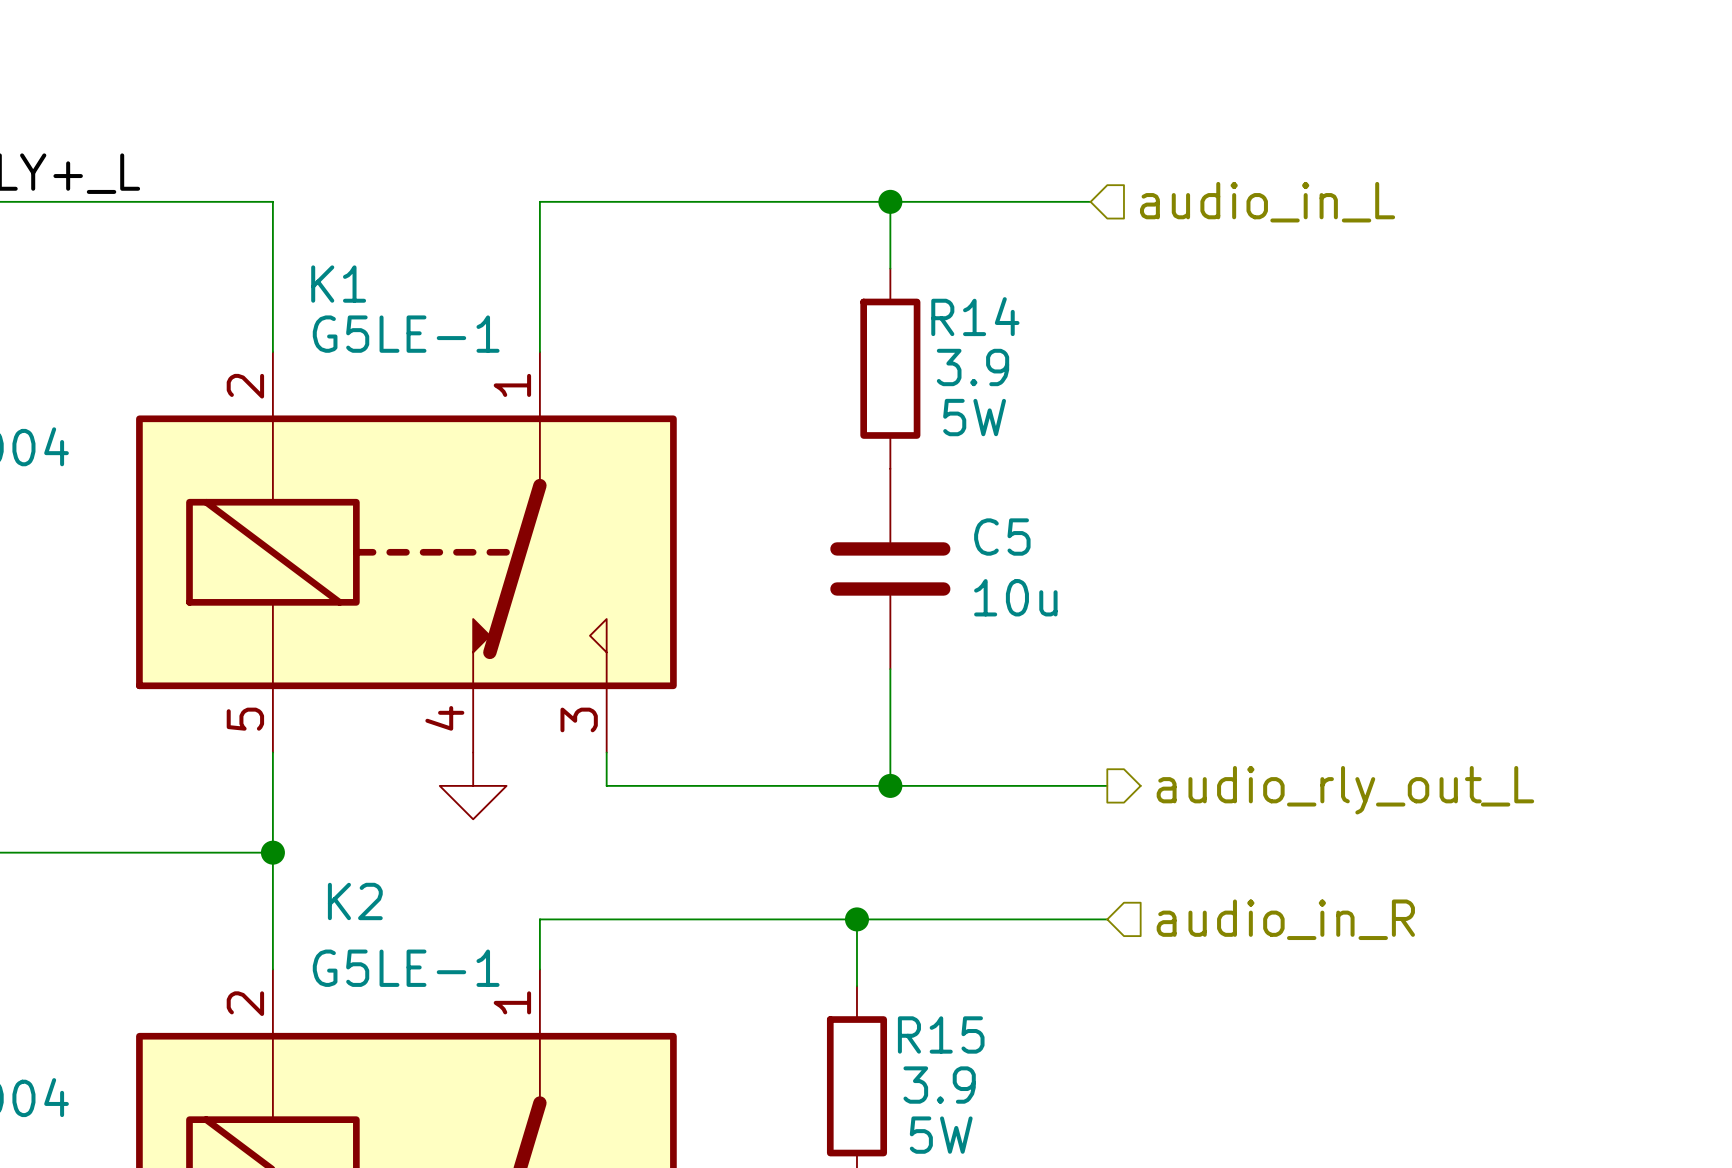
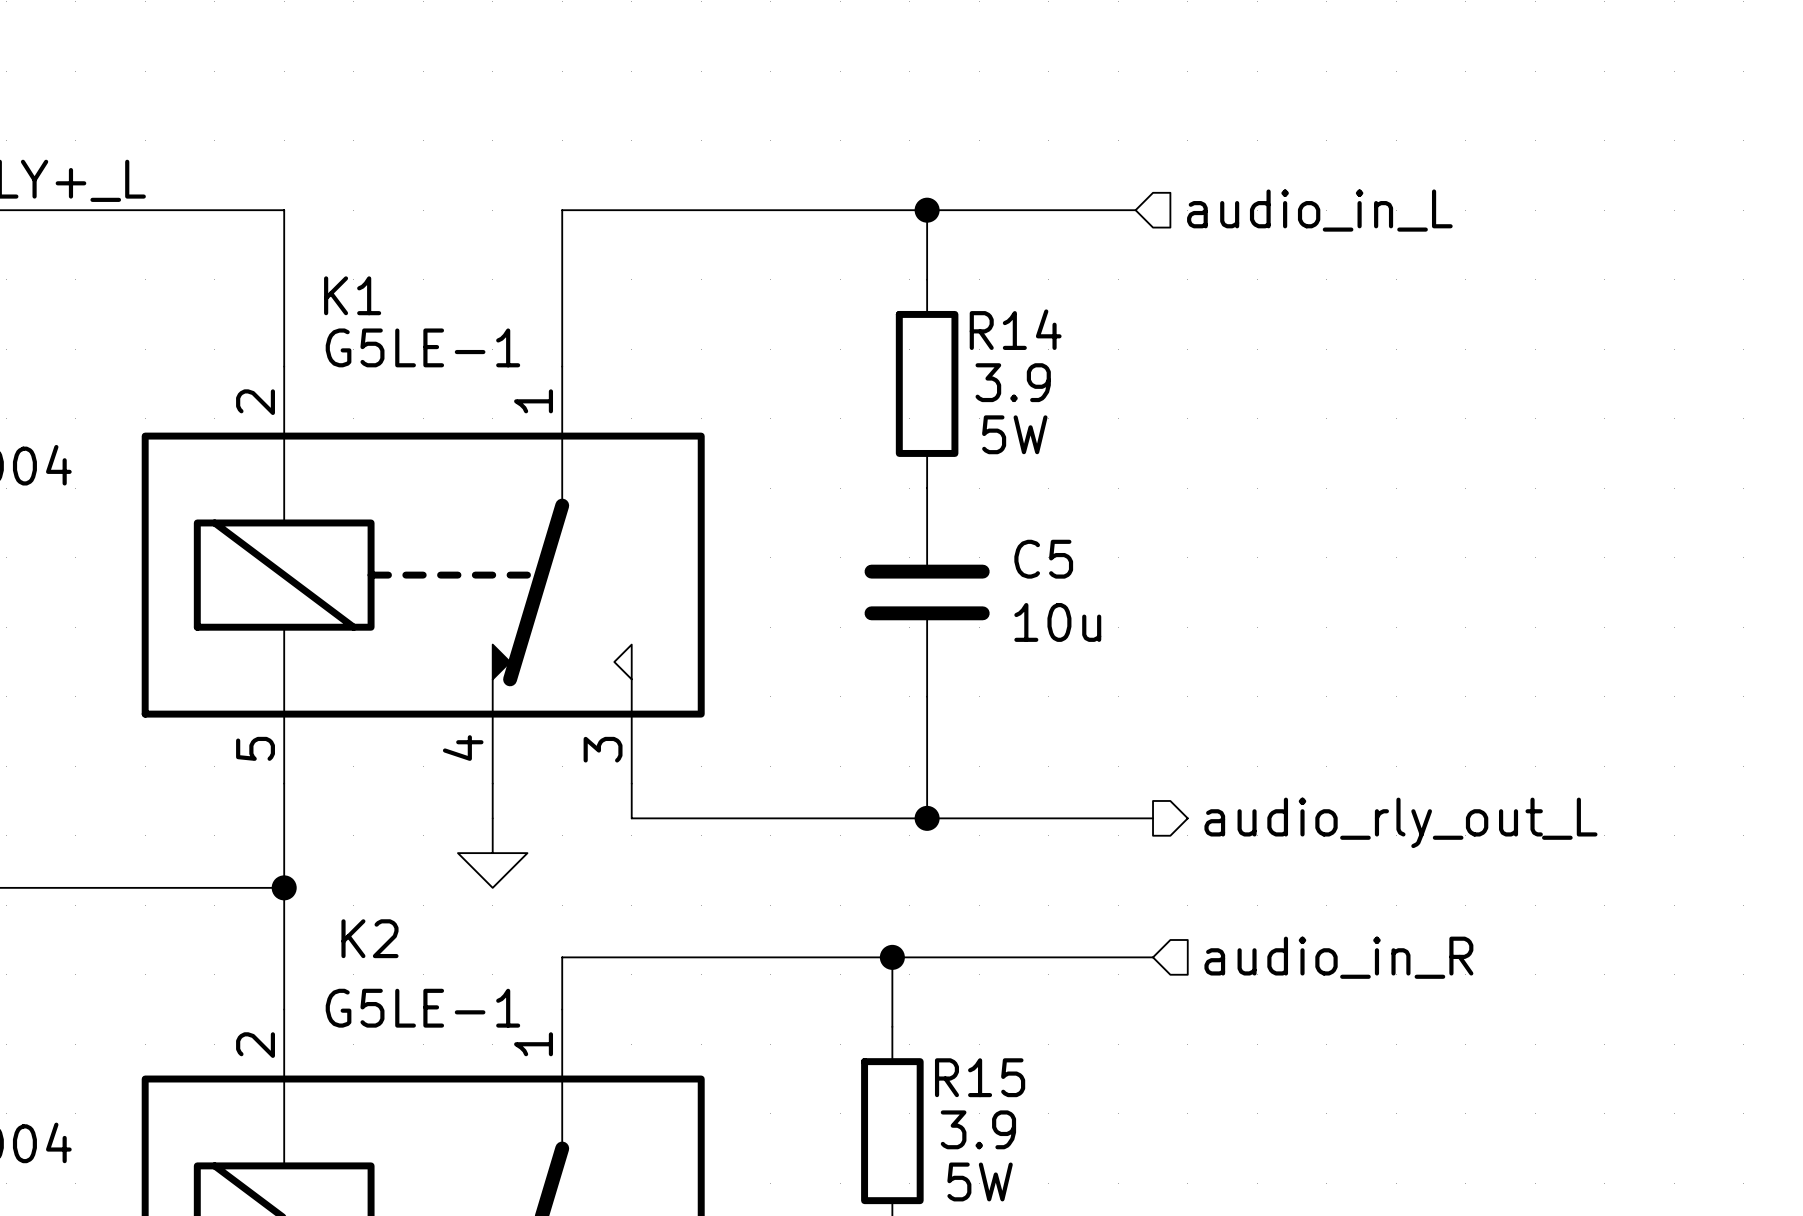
power symbol position: (473, 785) -> (492, 853)

